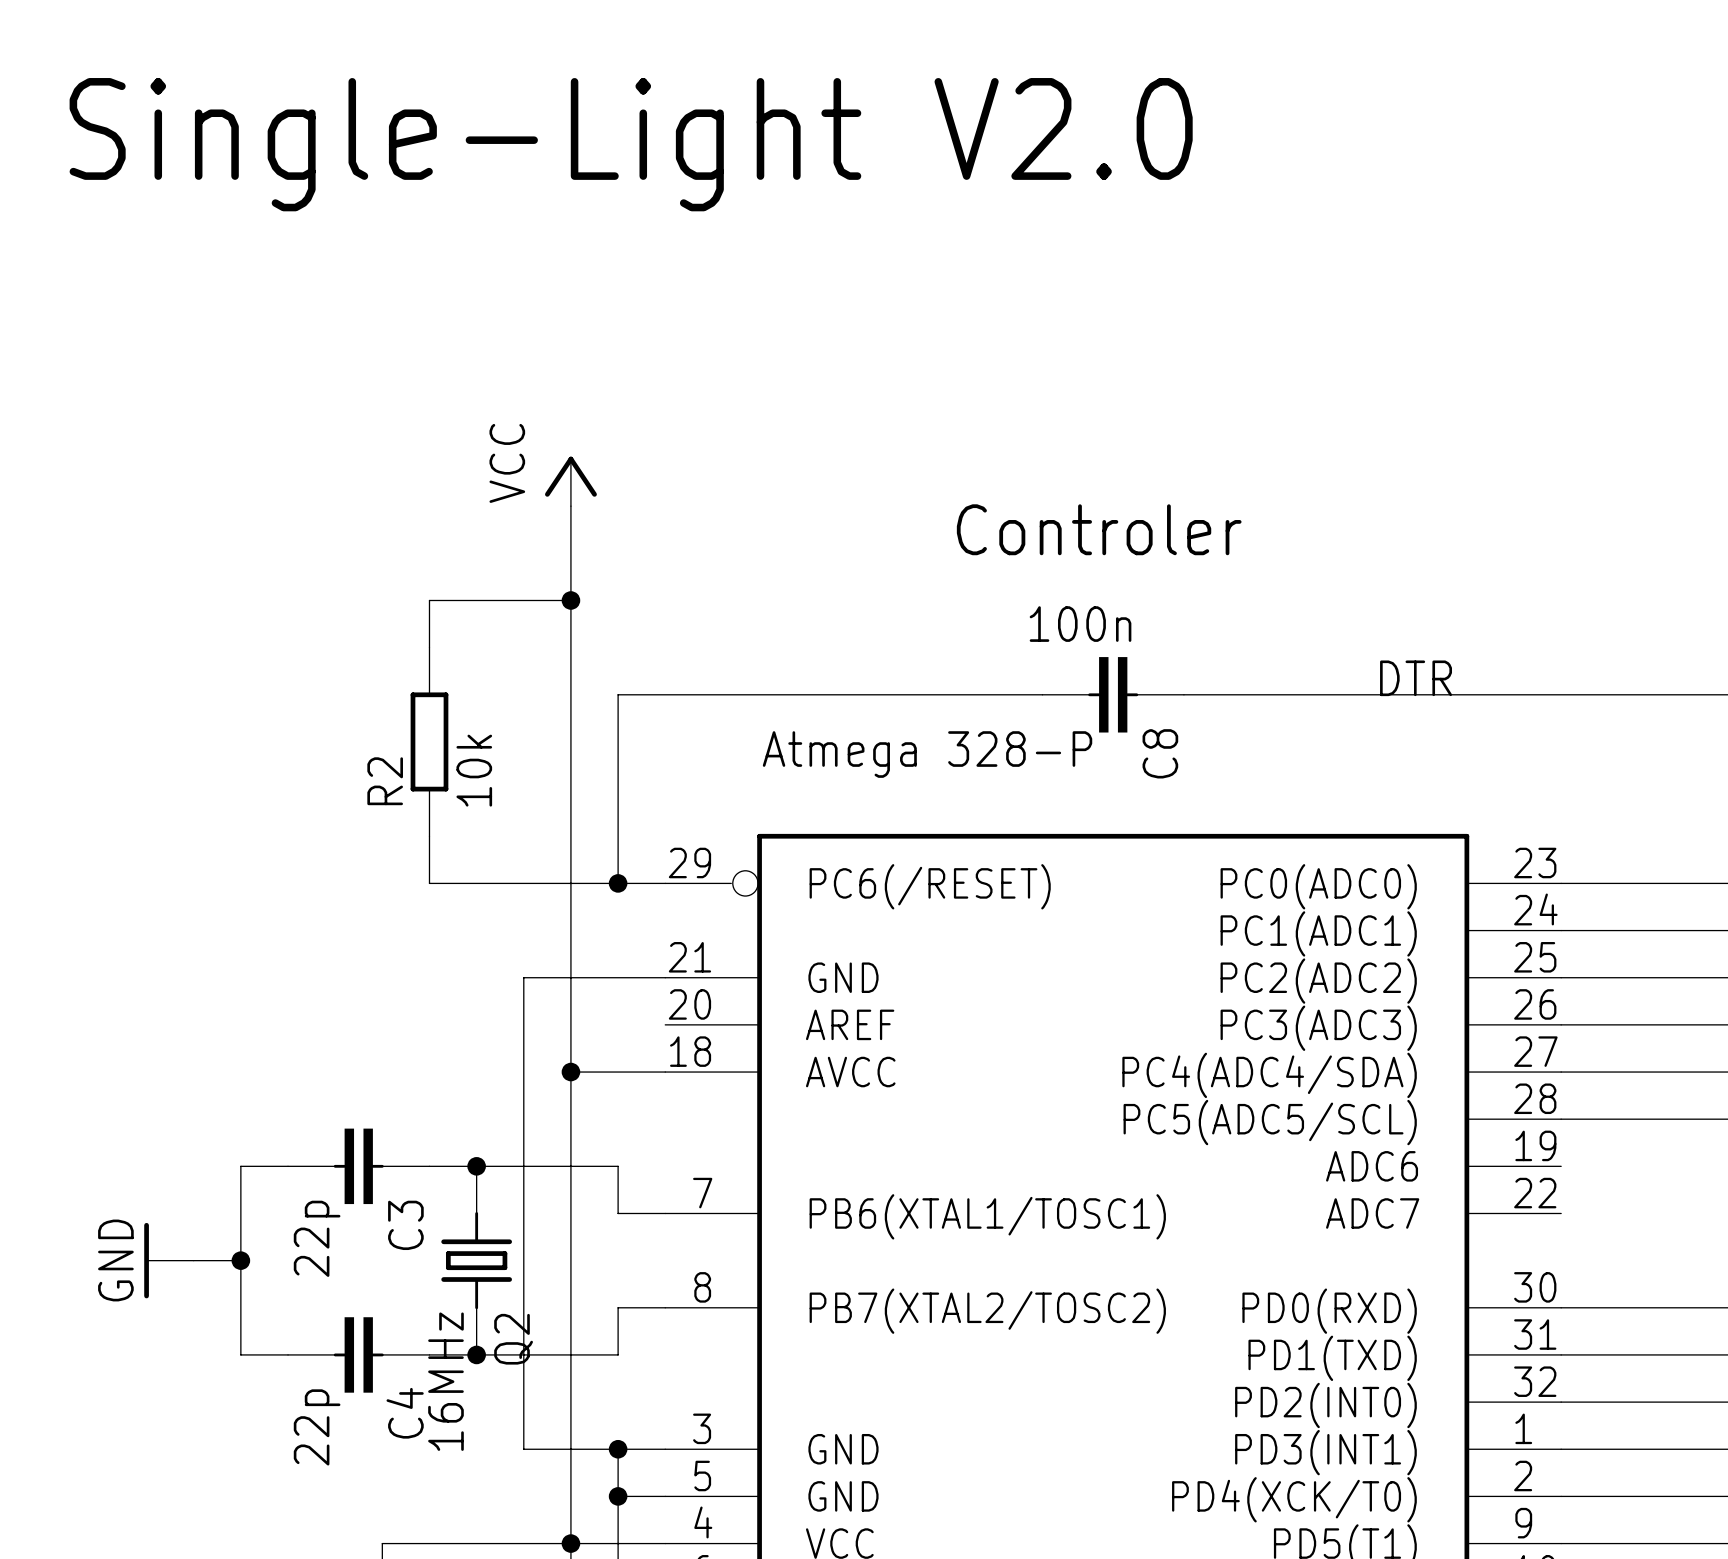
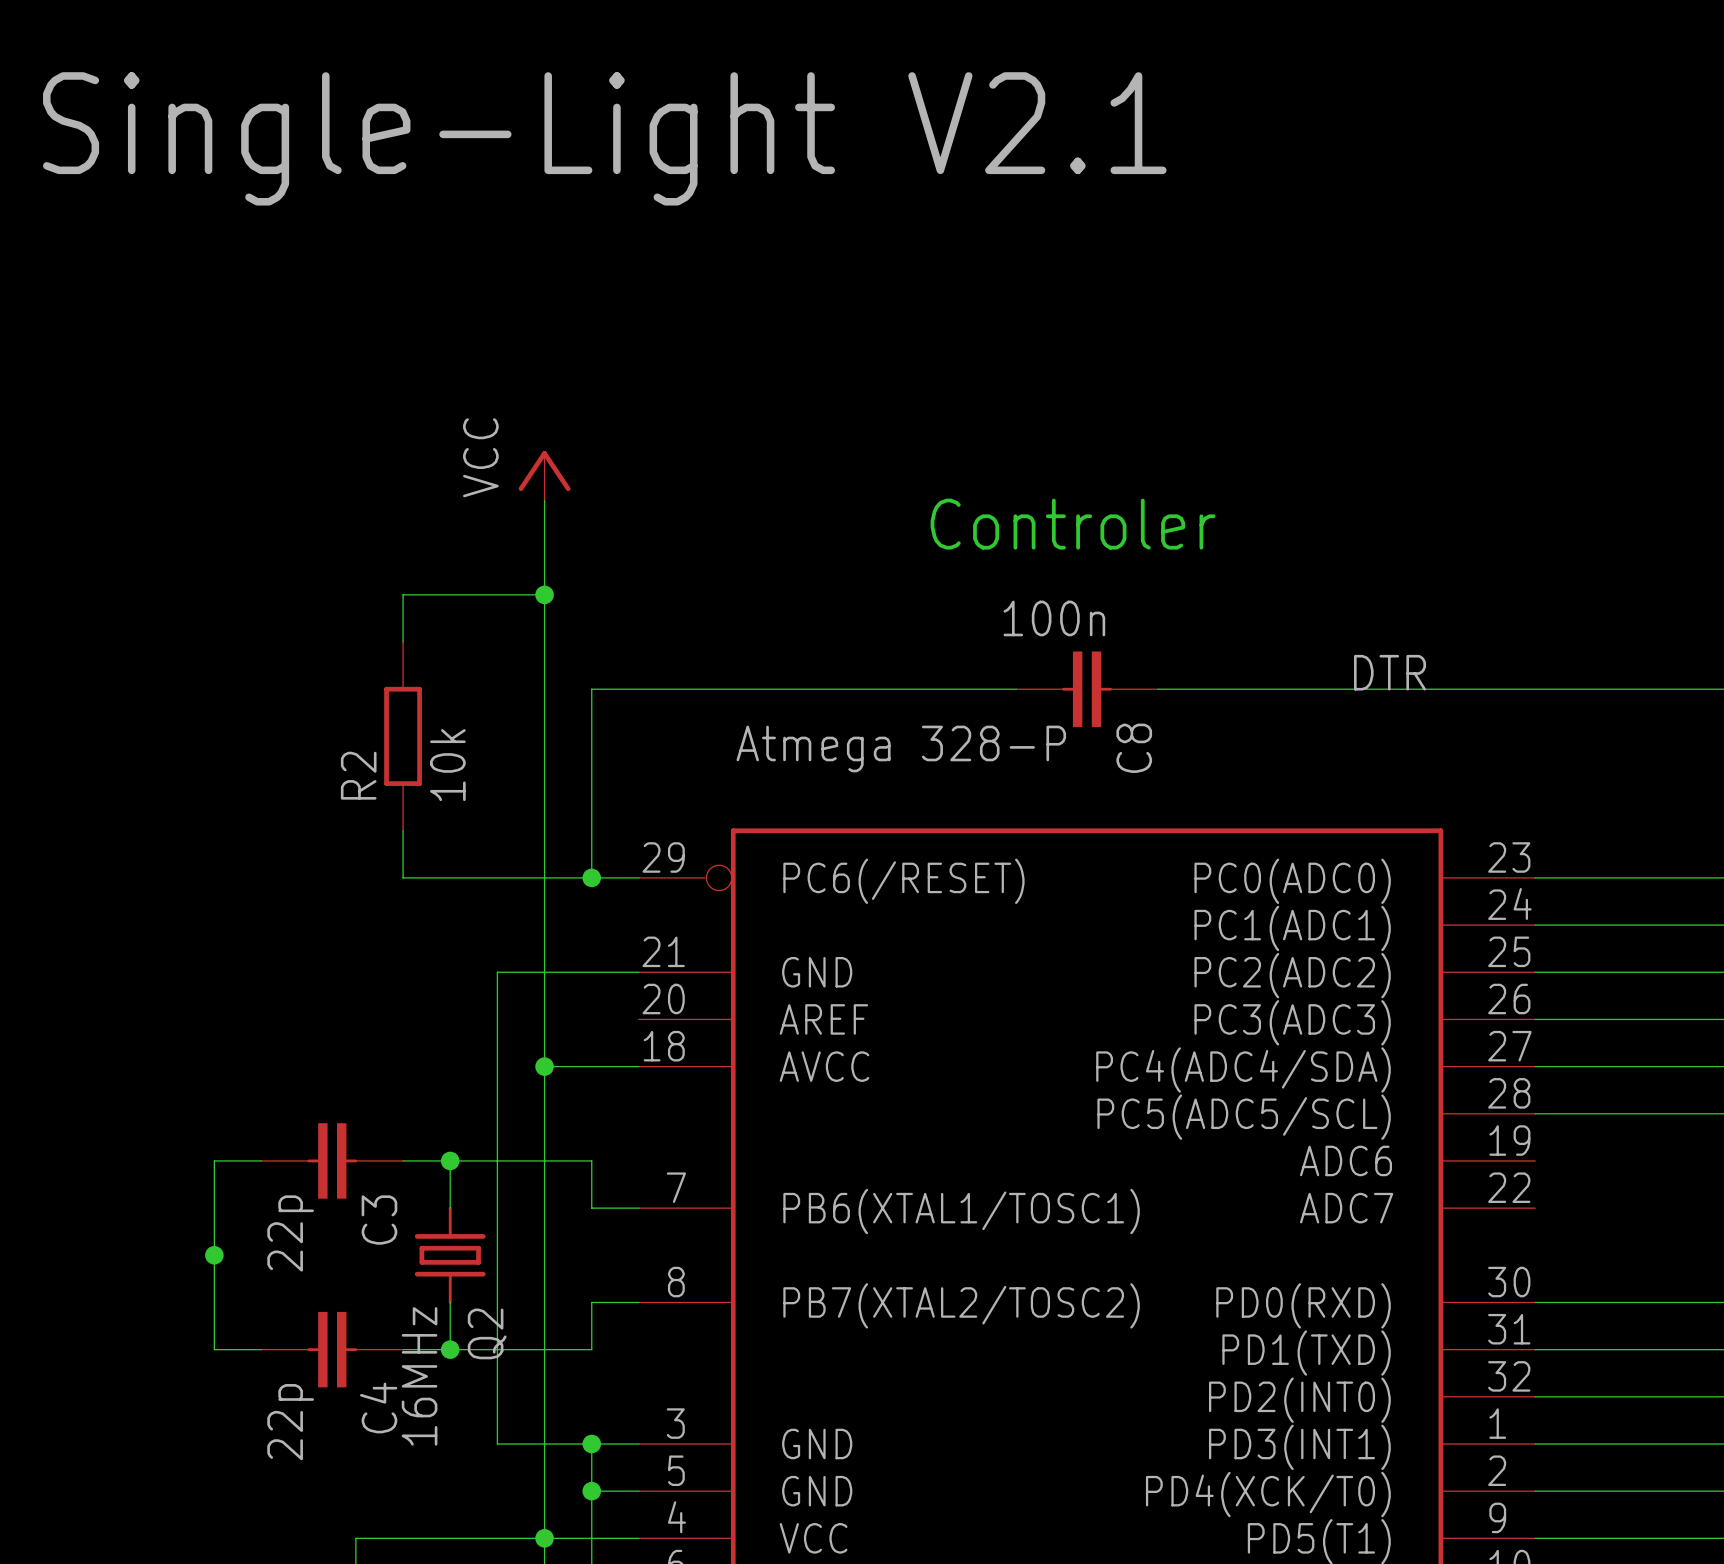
text: Single-Light V2.0 (631, 144) -> Single-Light V2.1 (604, 138)
power symbol: GND (168, 1260) -> none
wire: (193, 1260) (240, 1260) -> none

